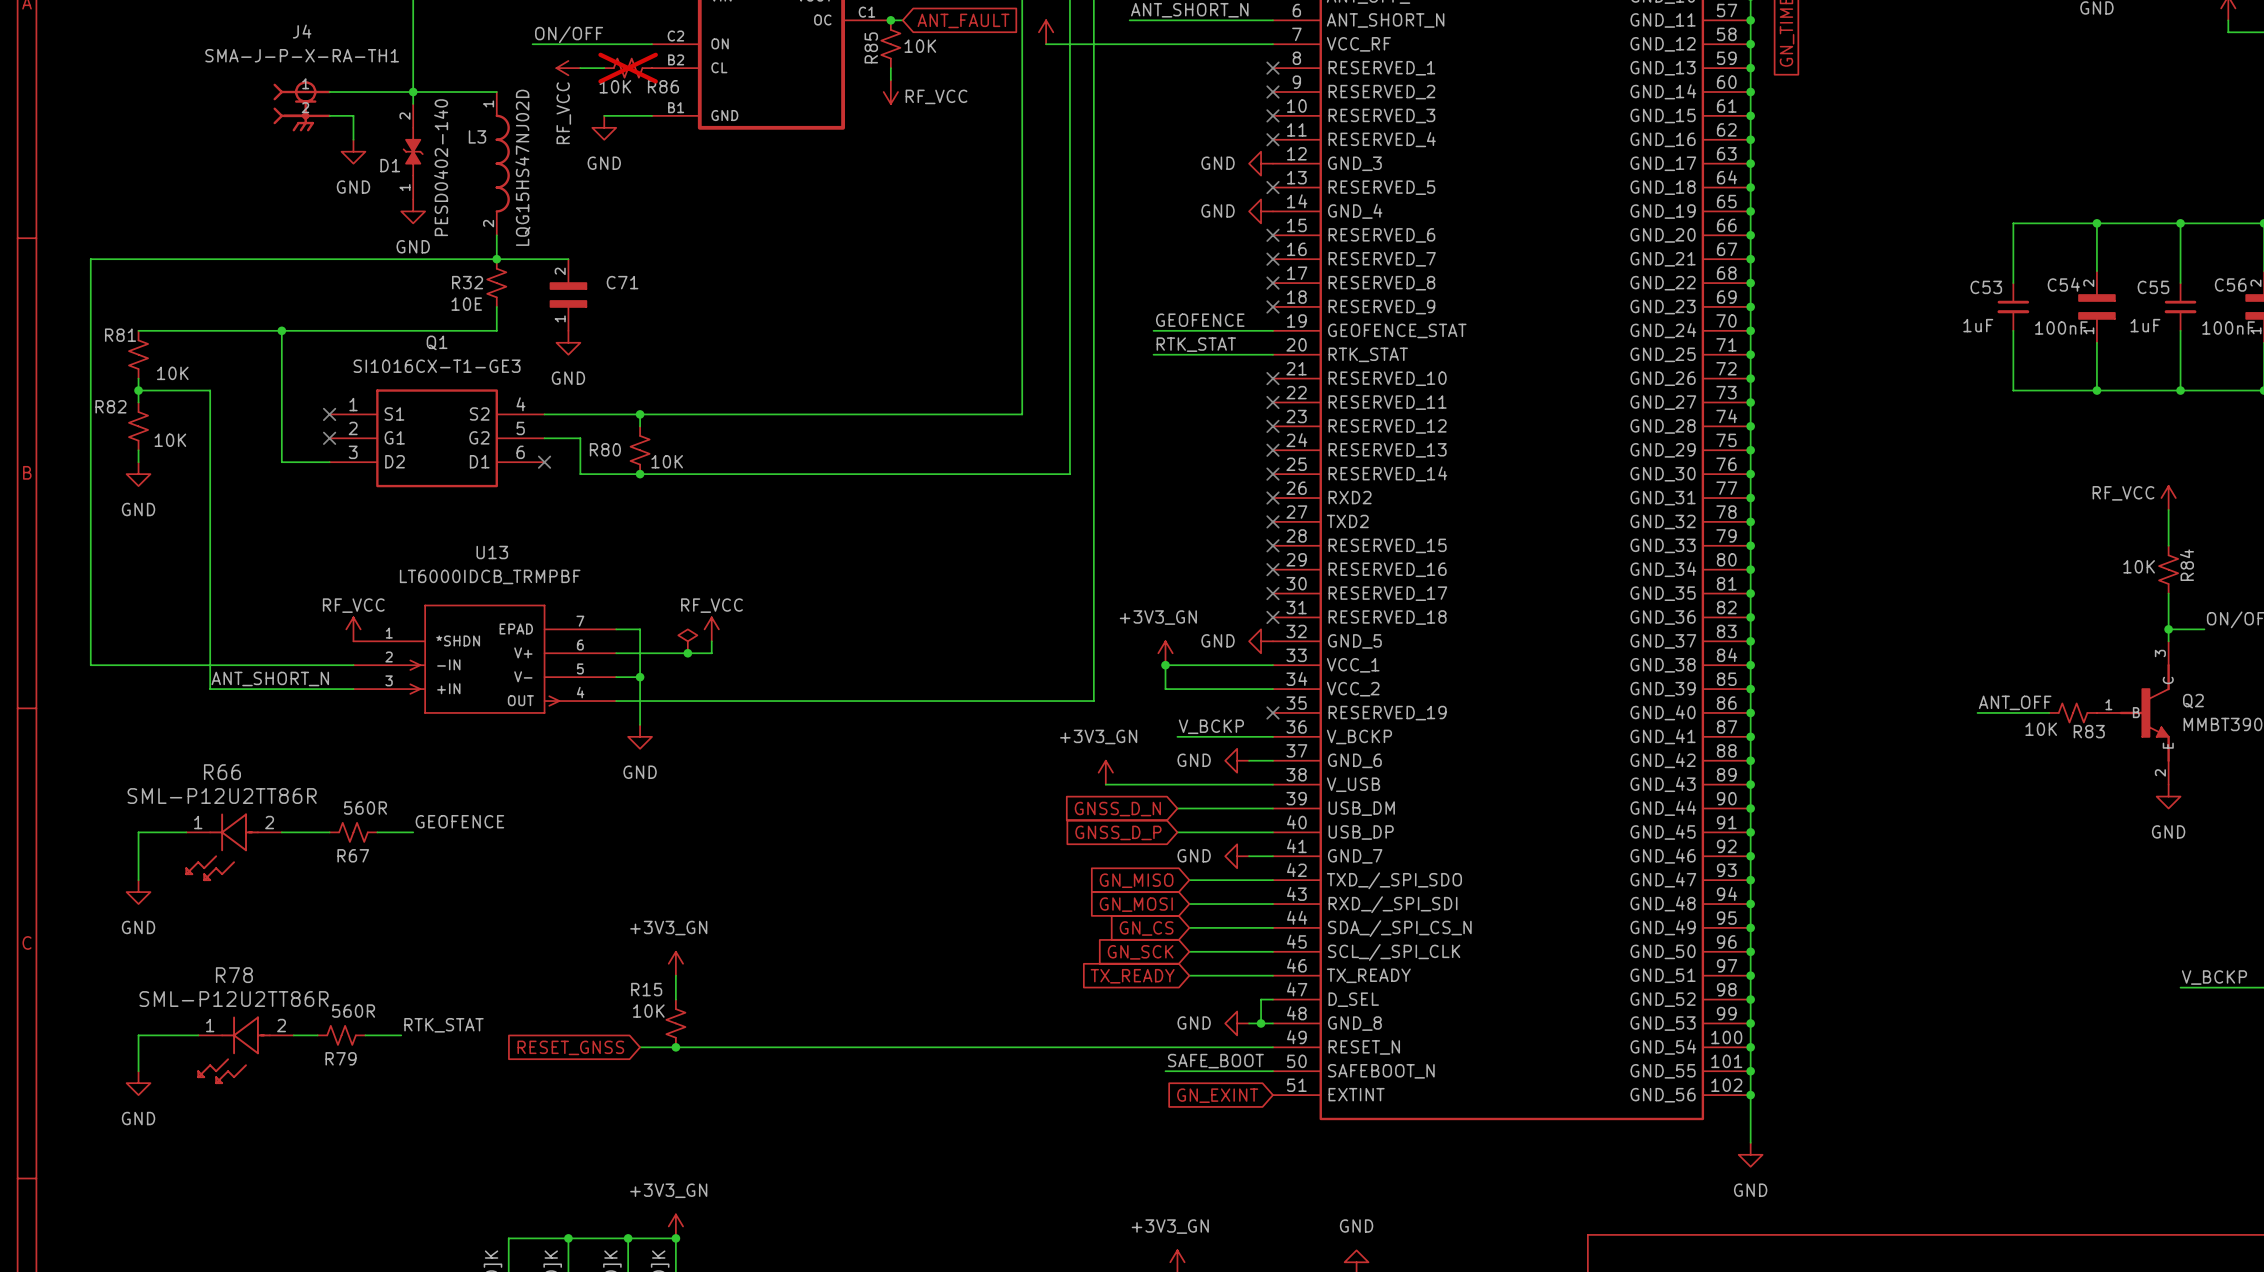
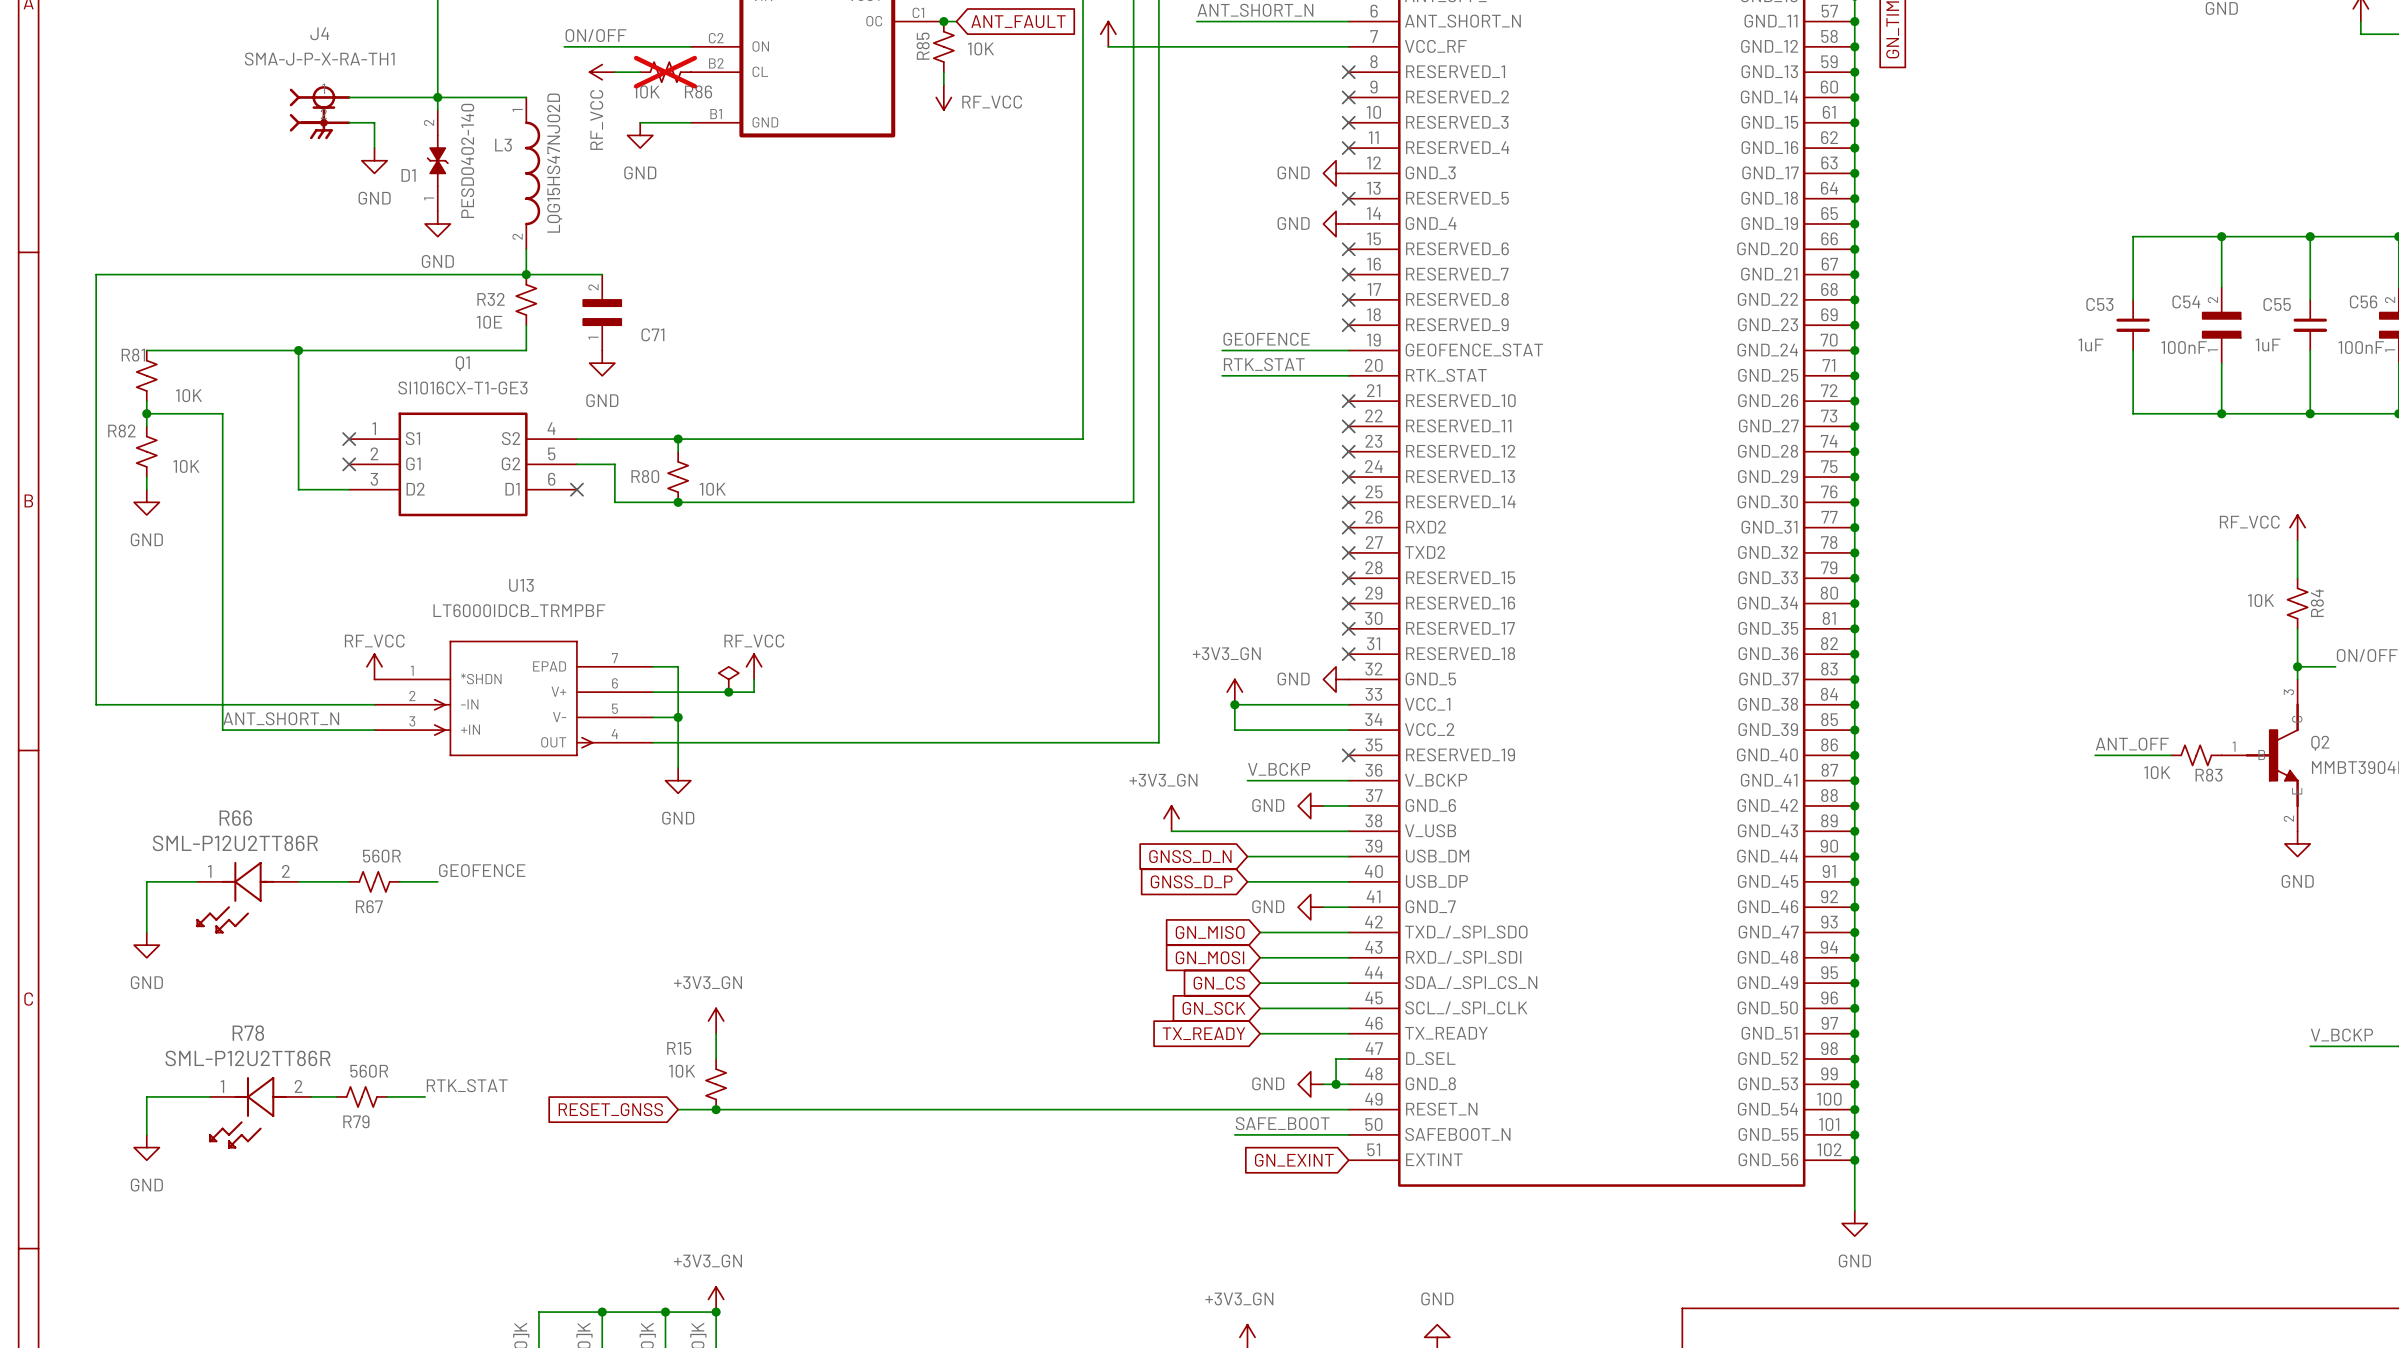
C71 name position: C71 (622, 282) -> C71 (652, 334)

